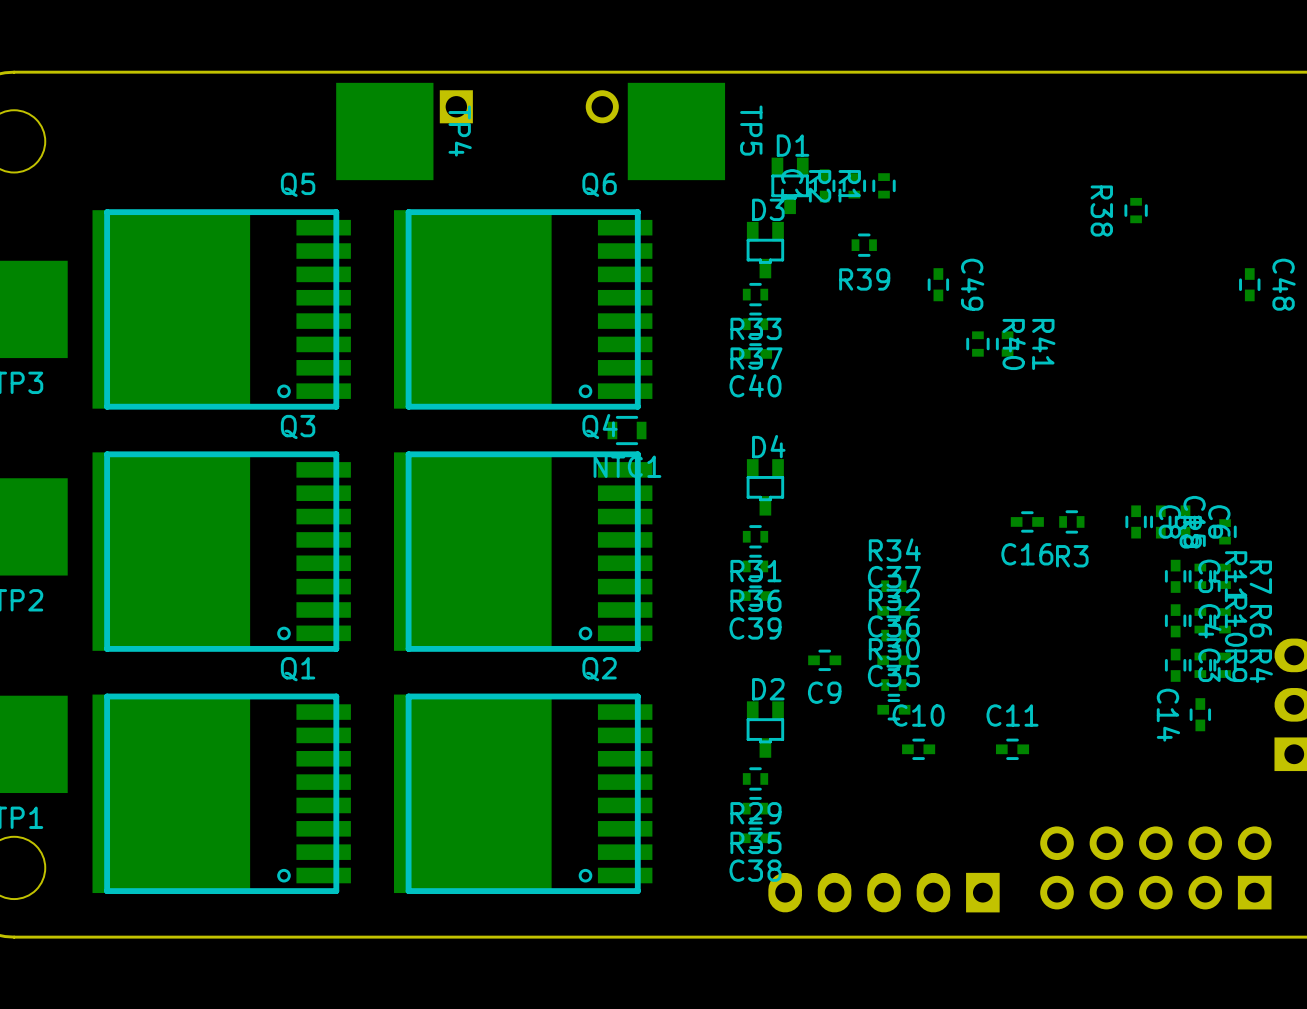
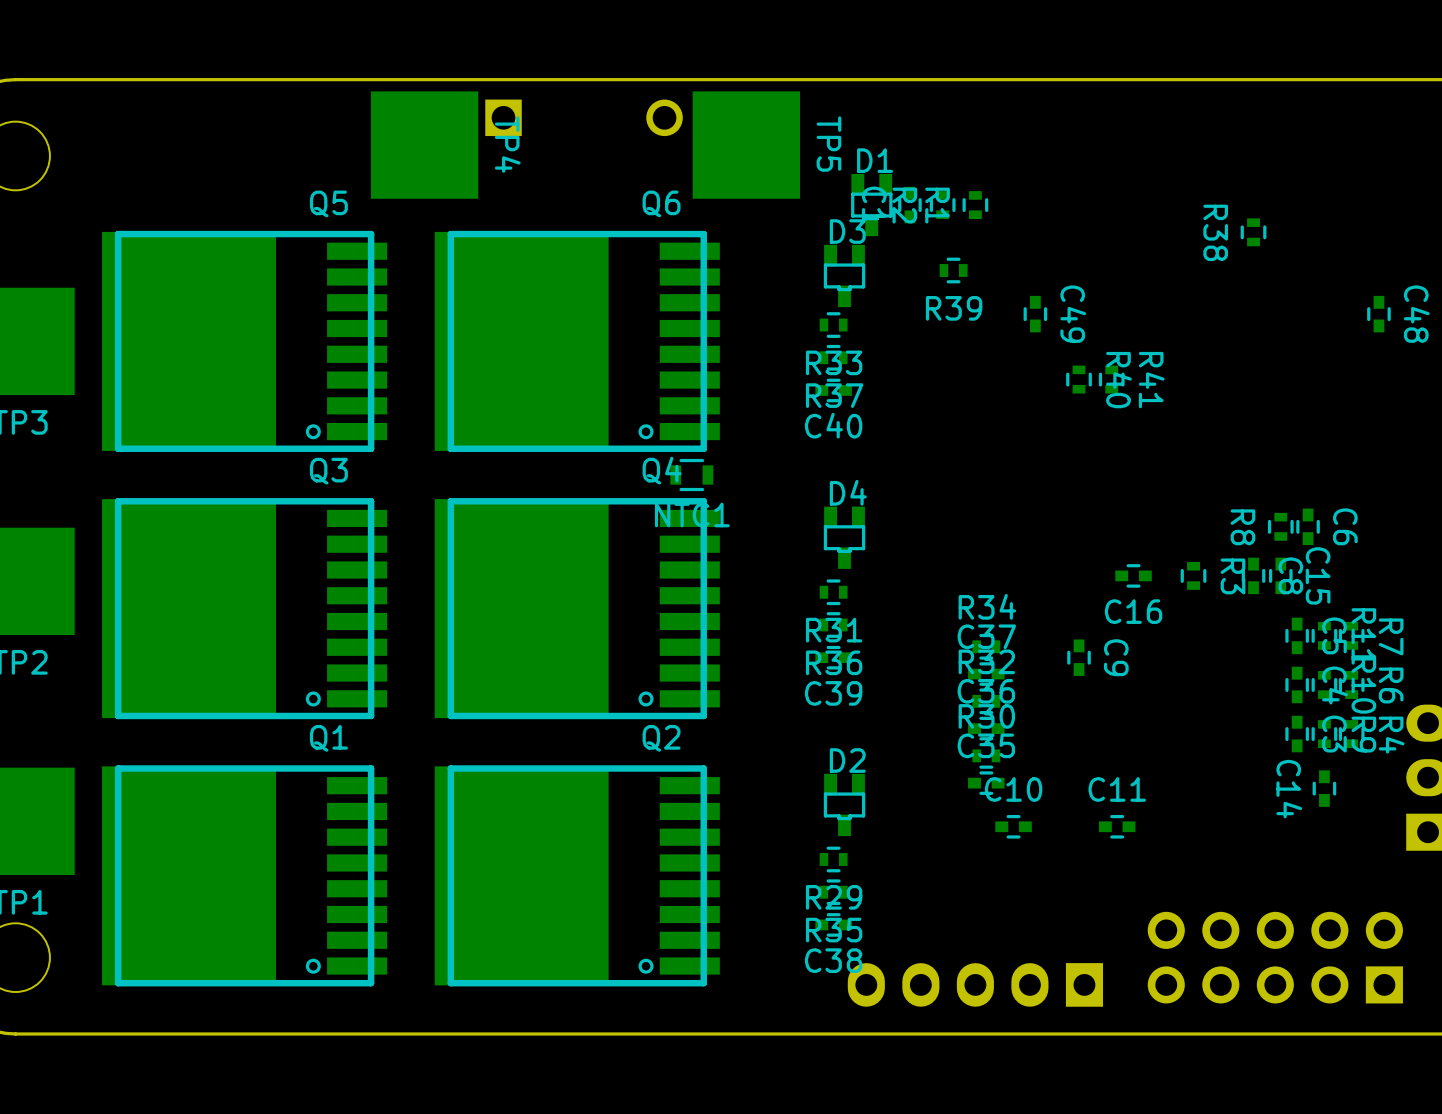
R3 rotation: 0° (1071, 521) -> 90° clockwise (1193, 575)
C6 position: (1185, 521) -> (1308, 526)
R8 position: (1225, 531) -> (1280, 526)
R3 name position: R3 (1072, 556) -> R3 (1232, 576)
C9 rotation: 0° (824, 660) -> 90° clockwise (1079, 657)
C9 position: (824, 660) -> (1079, 657)
C9 name position: C9 (824, 692) -> C9 (1116, 657)

